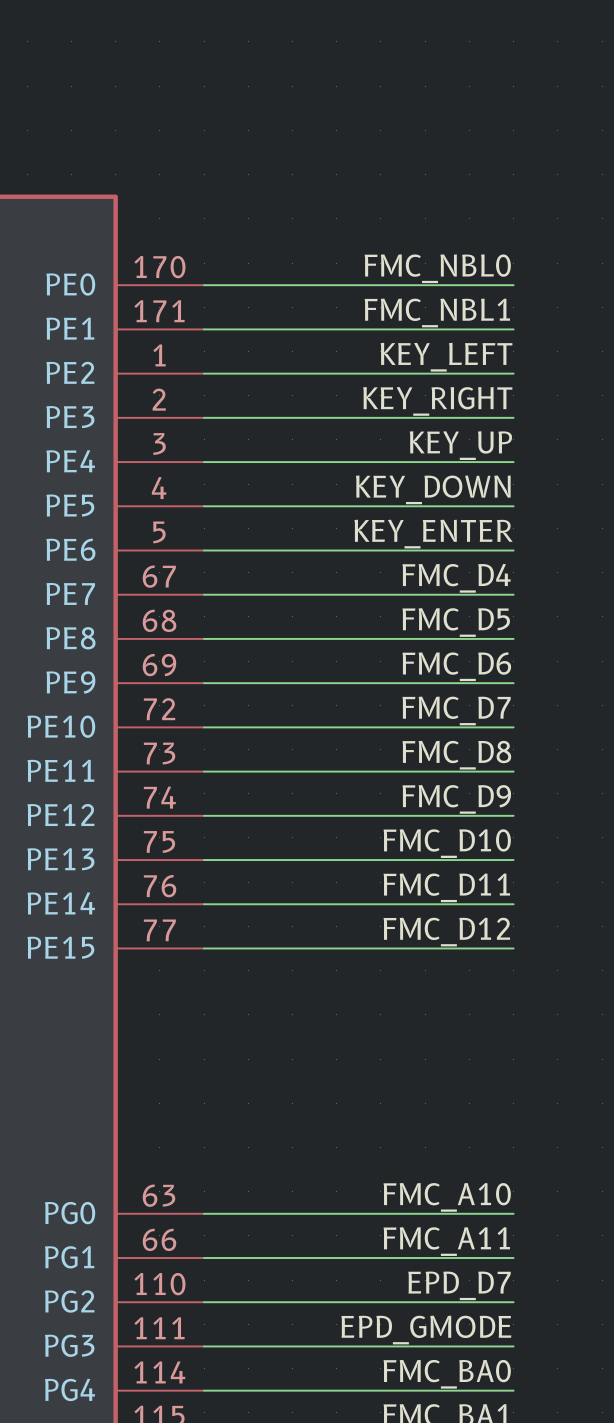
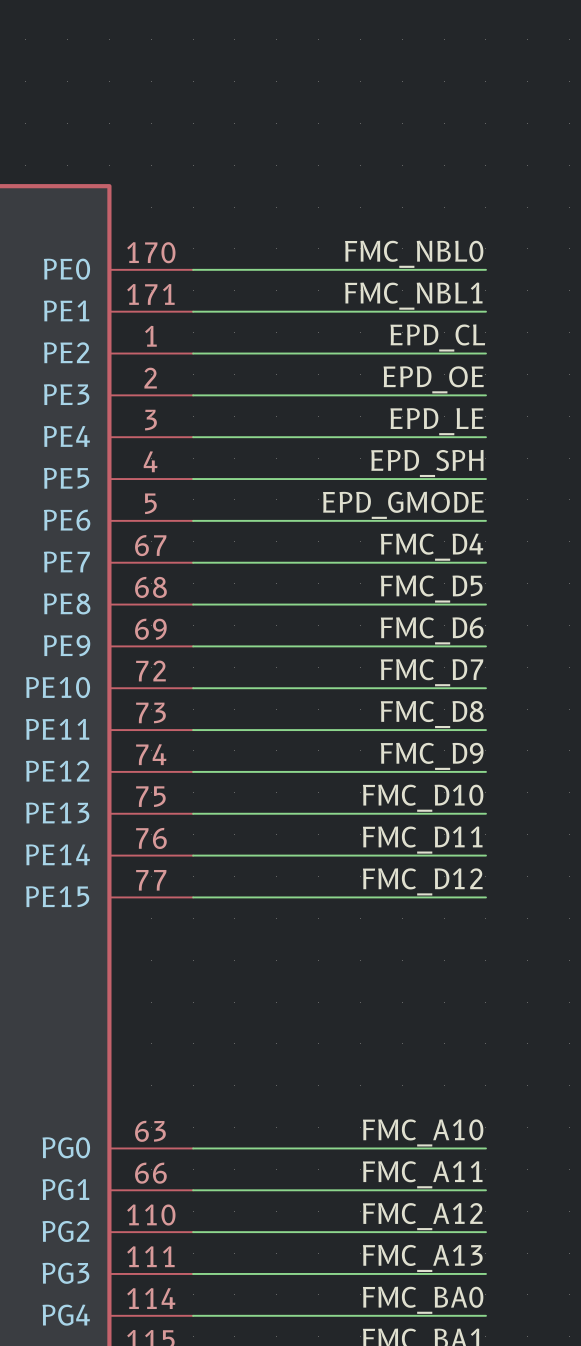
label: KEY_LEFT (446, 357) -> EPD_CL (437, 337)
label: KEY_RIGHT (437, 401) -> EPD_OE (433, 379)
label: KEY_UP (460, 445) -> EPD_LE (437, 421)
label: KEY_DOWN (433, 489) -> EPD_SPH (427, 463)
label: KEY_ENTER (433, 534) -> EPD_GMODE (403, 505)
label: EPD_D7 (459, 1285) -> FMC_A12 (422, 1216)
label: EPD_GMODE (426, 1330) -> FMC_A13 (422, 1258)

